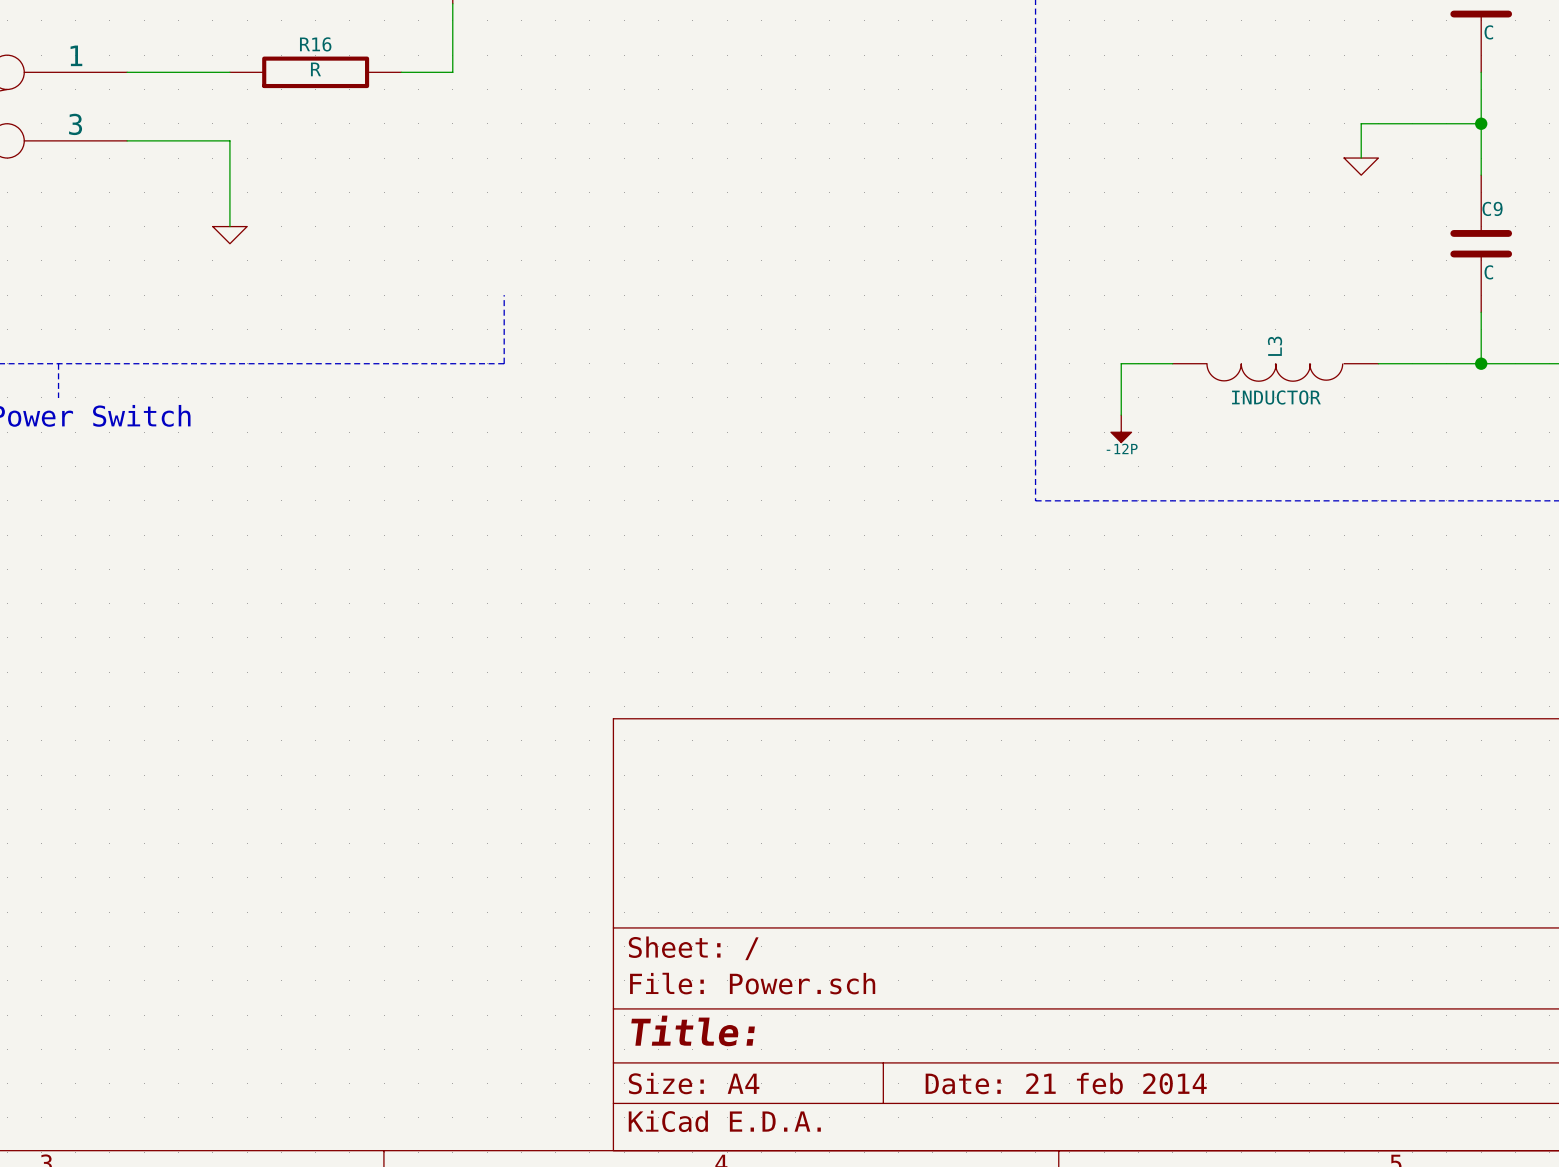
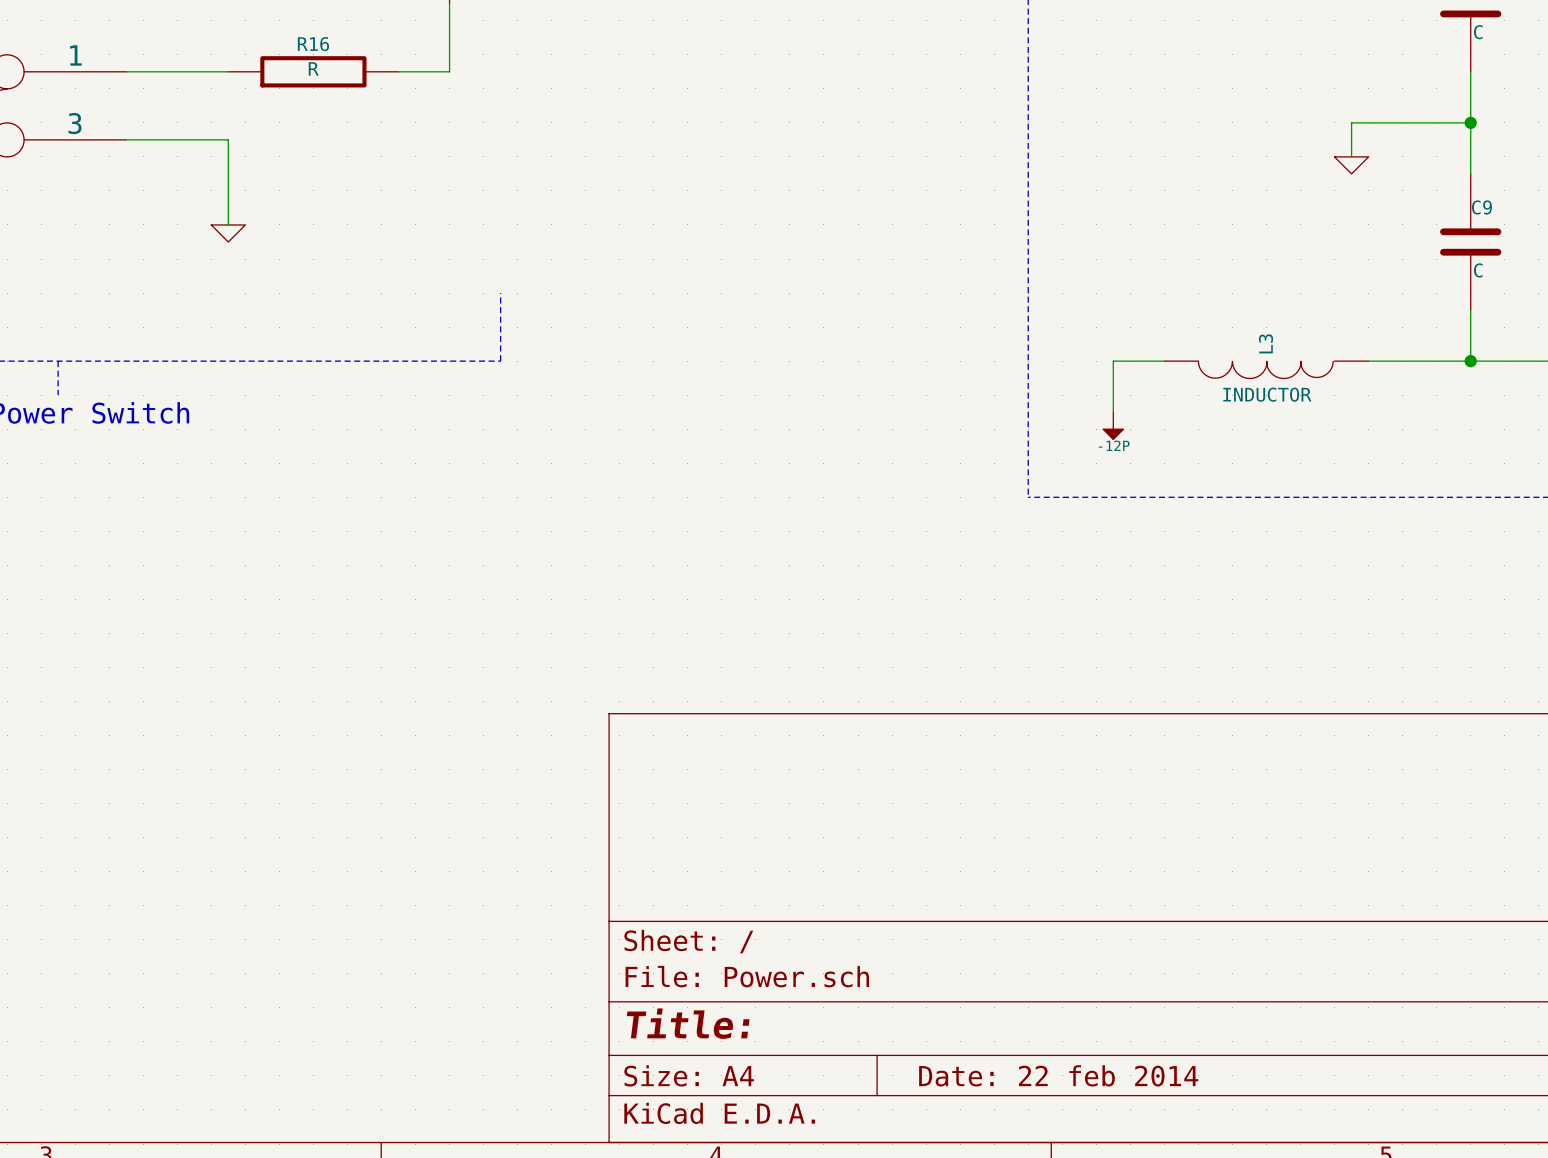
title block: Date: 21 feb 2014 (1066, 1083) -> Date: 22 feb 2014 (1058, 1075)

